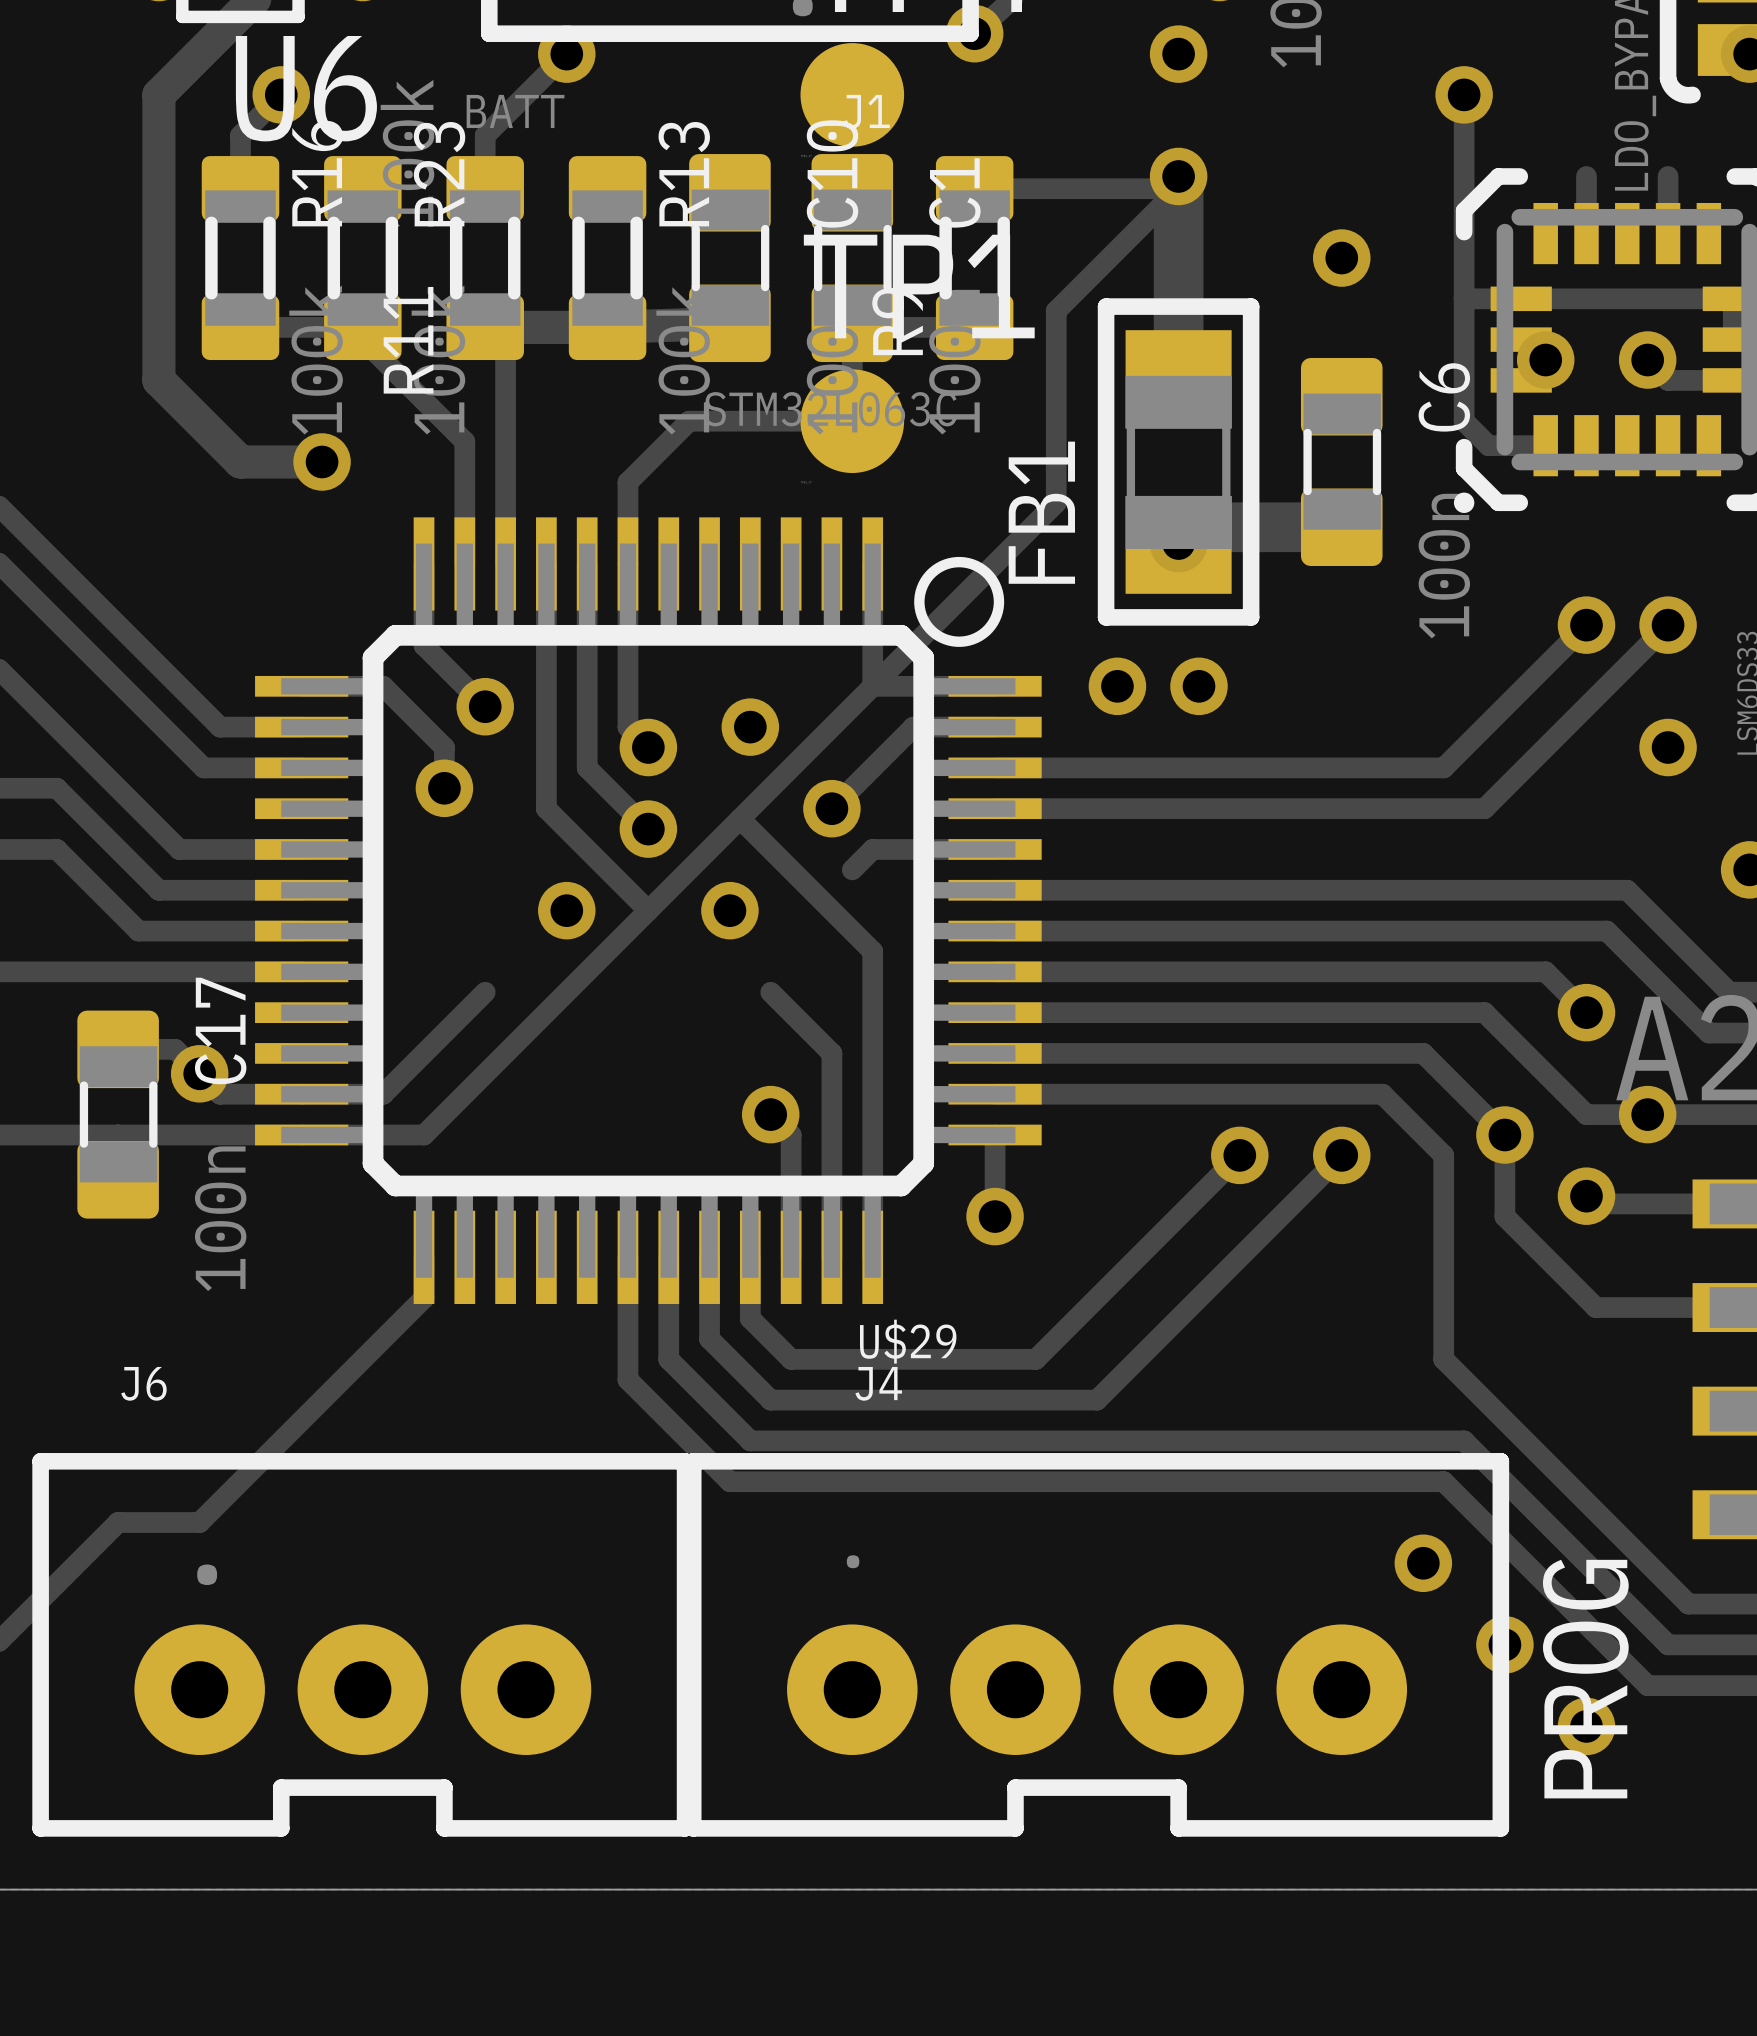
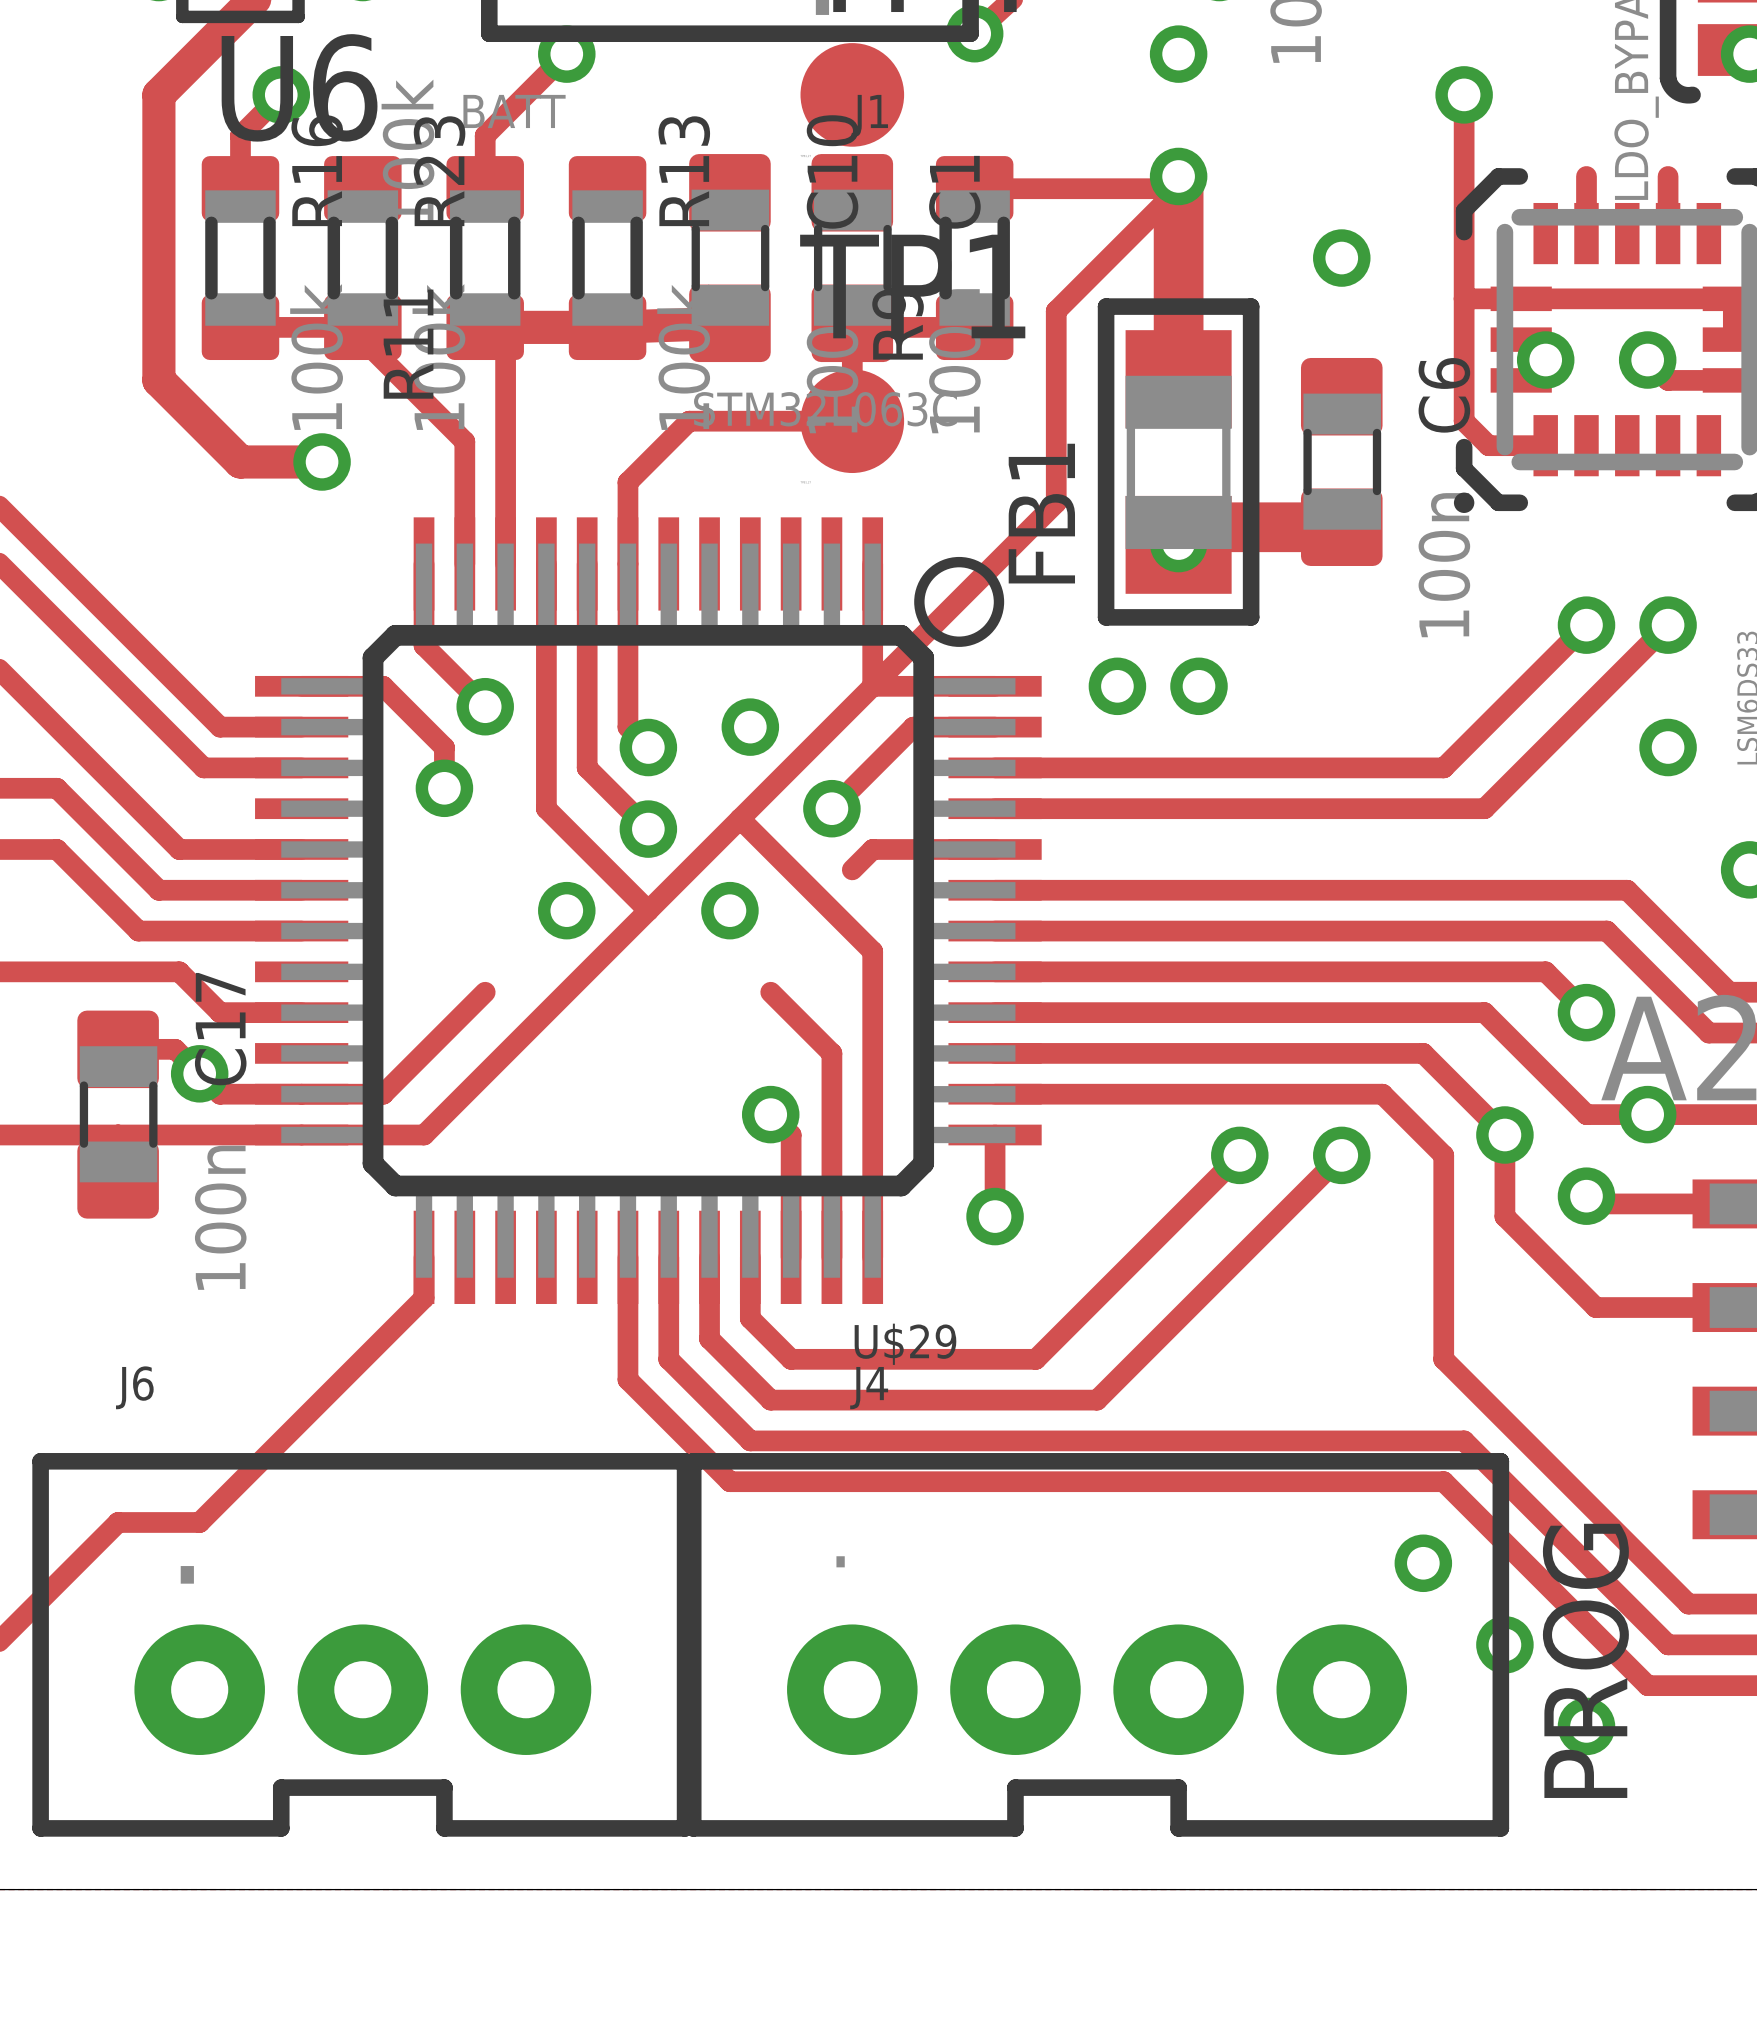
track: (179, 971) (301, 971) -> (179, 971) (220, 1012) (301, 1012)

